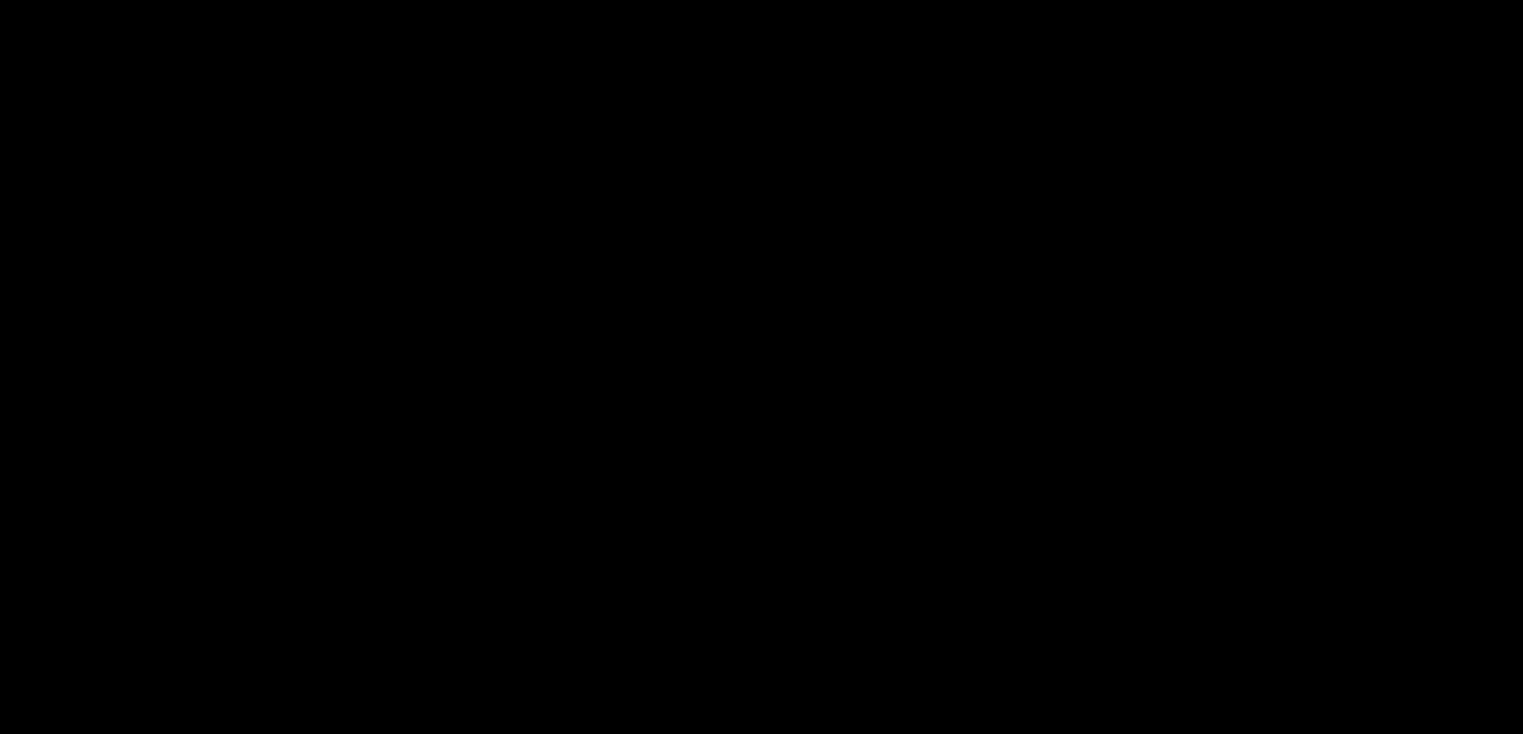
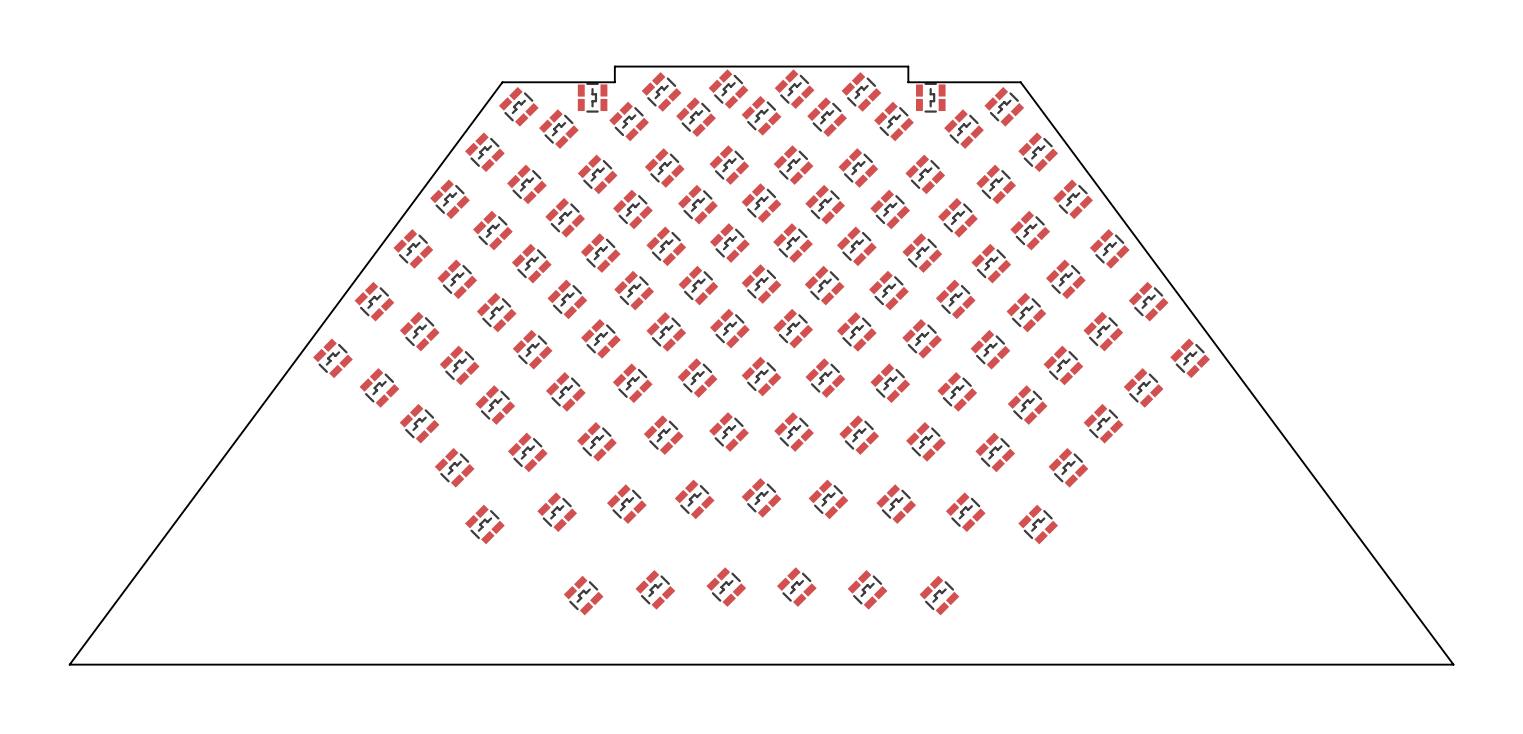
board edge: none -> (614, 66) (614, 82) (502, 82) (69, 664) (1453, 664) (1020, 82) (908, 82) (908, 66) (614, 66)
part: none -> (728, 89)
part: none -> (794, 89)
part: none -> (661, 91)
part: none -> (861, 91)
part: none -> (592, 97)
part: none -> (930, 97)
part: none -> (518, 106)
part: none -> (1004, 106)
part: none -> (761, 115)
part: none -> (696, 117)
part: none -> (827, 117)
part: none -> (629, 121)
part: none -> (893, 121)
part: none -> (558, 129)
part: none -> (964, 129)
part: none -> (484, 152)
part: none -> (1038, 152)
part: none -> (729, 165)
part: none -> (793, 165)
part: none -> (664, 168)
part: none -> (858, 168)
part: none -> (597, 174)
part: none -> (925, 174)
part: none -> (526, 184)
part: none -> (996, 184)
part: none -> (449, 199)
part: none -> (1073, 199)
part: none -> (761, 203)
part: none -> (697, 204)
part: none -> (825, 204)
part: none -> (632, 209)
part: none -> (890, 209)
part: none -> (565, 217)
part: none -> (957, 217)
part: none -> (492, 230)
part: none -> (1030, 230)
part: none -> (729, 243)
part: none -> (793, 243)
part: none -> (666, 246)
part: none -> (856, 246)
part: none -> (413, 248)
part: none -> (1109, 248)
part: none -> (600, 253)
part: none -> (922, 253)
part: none -> (531, 263)
part: none -> (991, 263)
part: none -> (457, 279)
part: none -> (1065, 279)
part: none -> (761, 284)
part: none -> (698, 285)
part: none -> (824, 285)
part: none -> (634, 290)
part: none -> (888, 290)
part: none -> (567, 299)
part: none -> (955, 299)
part: none -> (374, 301)
part: none -> (1148, 301)
part: none -> (496, 312)
part: none -> (1026, 312)
part: none -> (729, 328)
part: none -> (793, 328)
part: none -> (419, 331)
part: none -> (666, 331)
part: none -> (856, 331)
part: none -> (1103, 331)
part: none -> (600, 338)
part: none -> (922, 338)
part: none -> (532, 349)
part: none -> (990, 349)
part: none -> (332, 358)
part: none -> (1190, 358)
part: none -> (459, 365)
part: none -> (1063, 365)
part: none -> (761, 376)
part: none -> (697, 378)
part: none -> (825, 378)
part: none -> (632, 383)
part: none -> (890, 383)
part: none -> (379, 387)
part: none -> (1143, 387)
part: none -> (565, 391)
part: none -> (957, 391)
part: none -> (495, 405)
part: none -> (1027, 405)
part: none -> (419, 423)
part: none -> (1103, 423)
part: none -> (729, 432)
part: none -> (794, 432)
part: none -> (663, 435)
part: none -> (859, 435)
part: none -> (596, 441)
part: none -> (925, 441)
part: none -> (527, 452)
part: none -> (995, 452)
part: none -> (454, 467)
part: none -> (1068, 467)
part: none -> (761, 497)
part: none -> (694, 499)
part: none -> (828, 499)
part: none -> (626, 504)
part: none -> (896, 504)
part: none -> (557, 512)
part: none -> (965, 512)
part: none -> (484, 524)
part: none -> (1038, 524)
part: none -> (726, 587)
part: none -> (796, 587)
part: none -> (655, 589)
part: none -> (867, 589)
part: none -> (583, 595)
part: none -> (939, 595)

